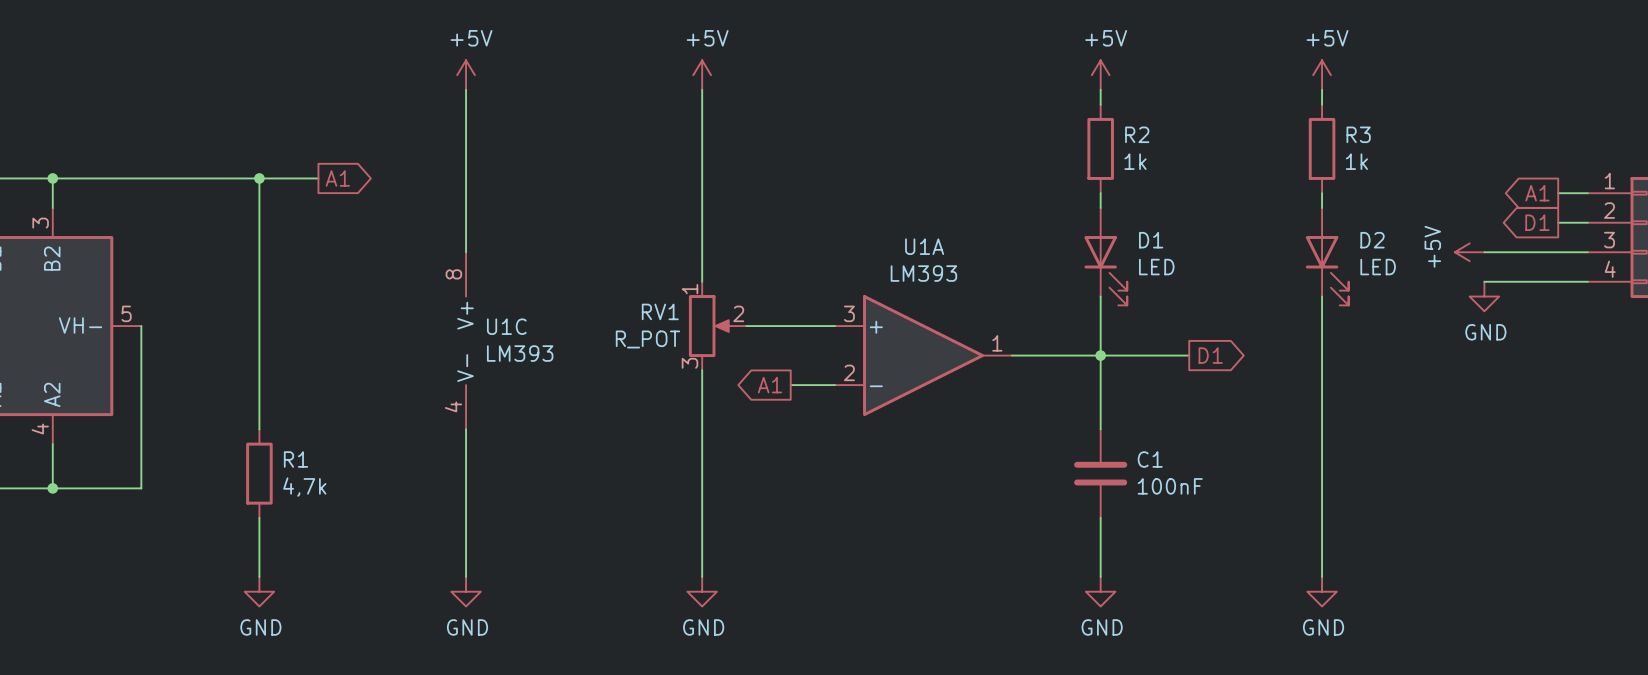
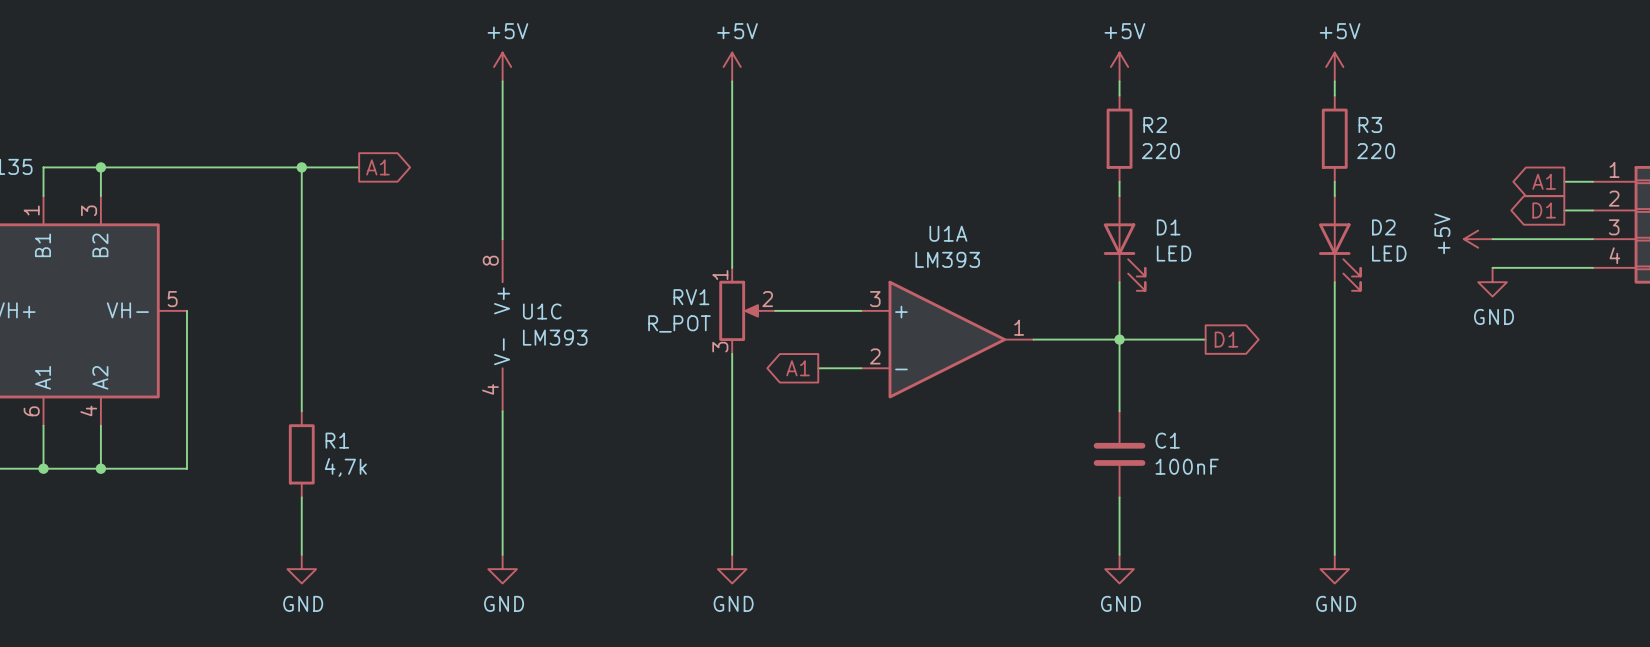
R2 value: 1k (1135, 161) -> 220 (1160, 151)
R3 value: 1k (1356, 161) -> 220 (1376, 151)

